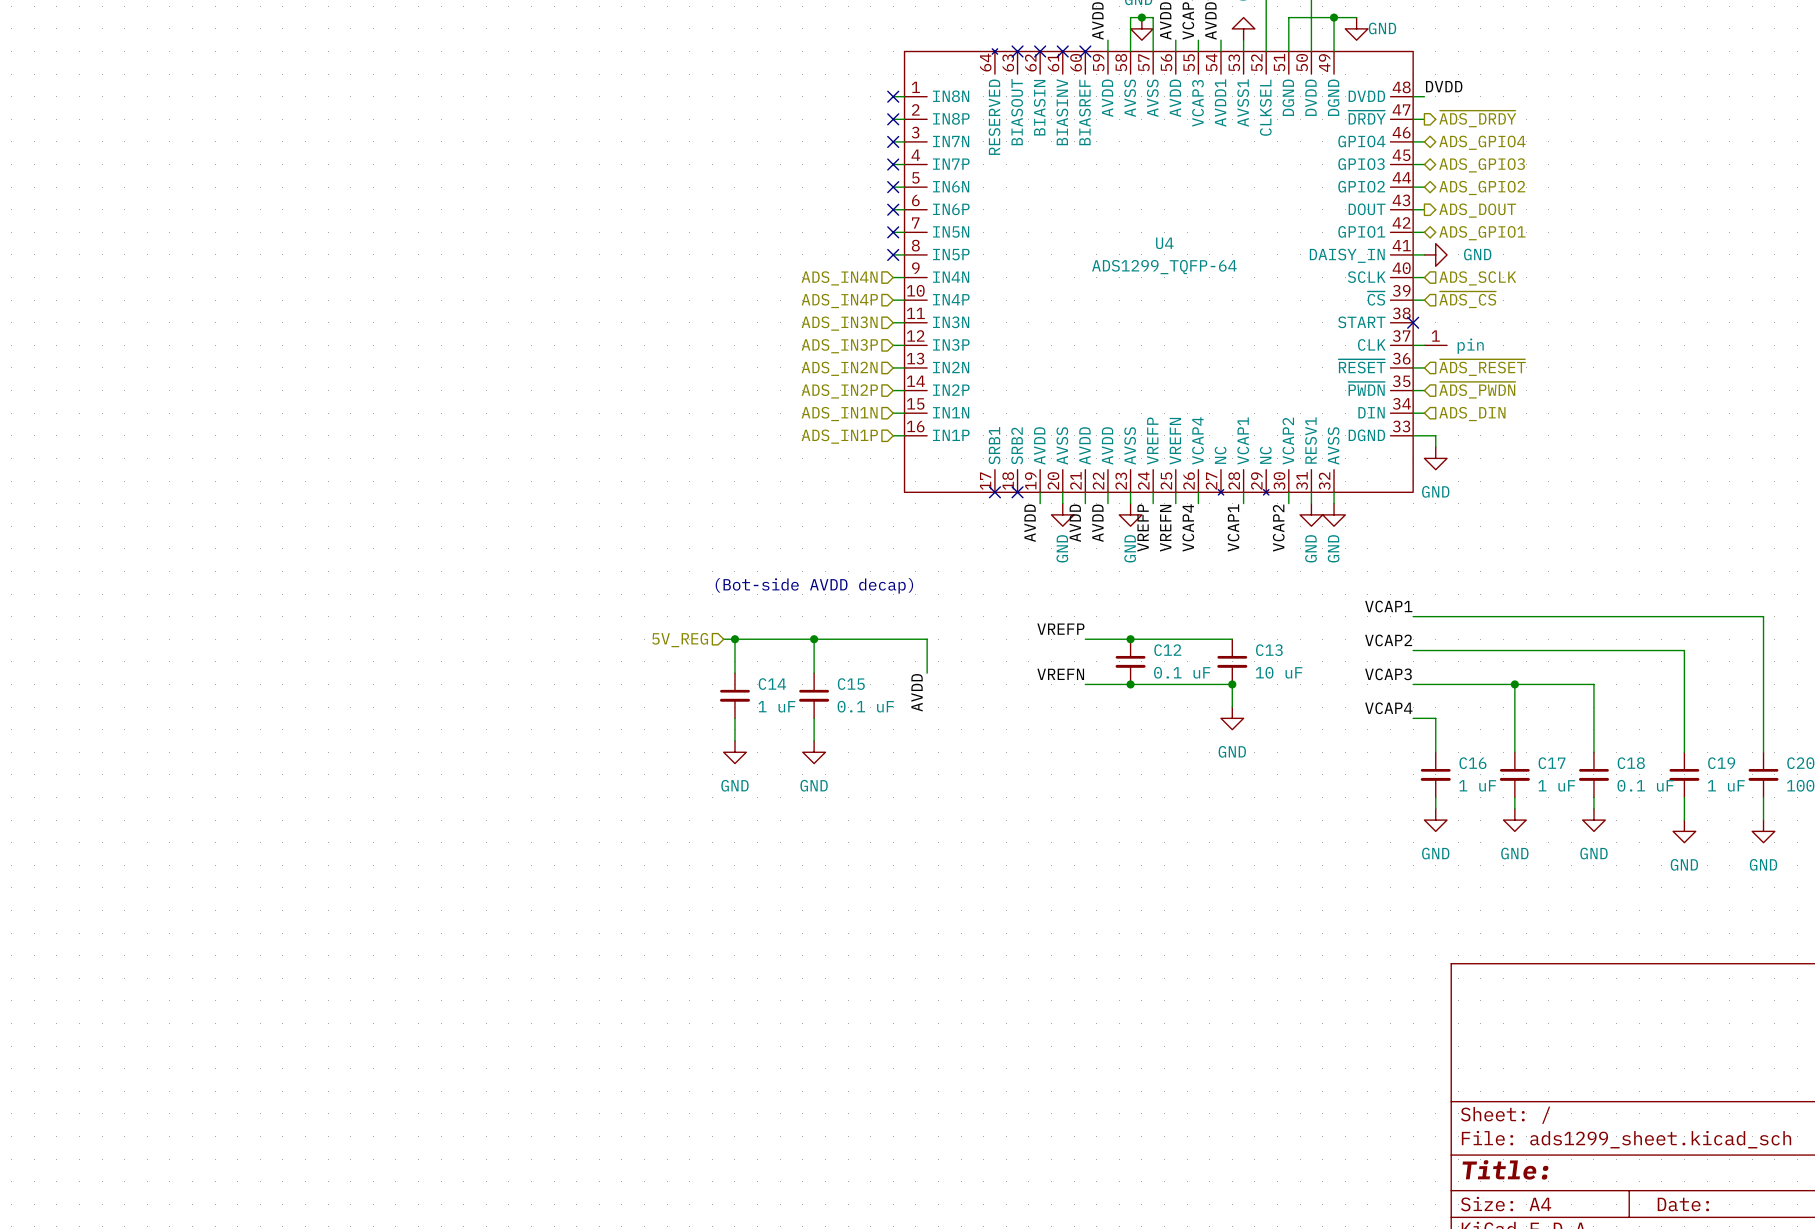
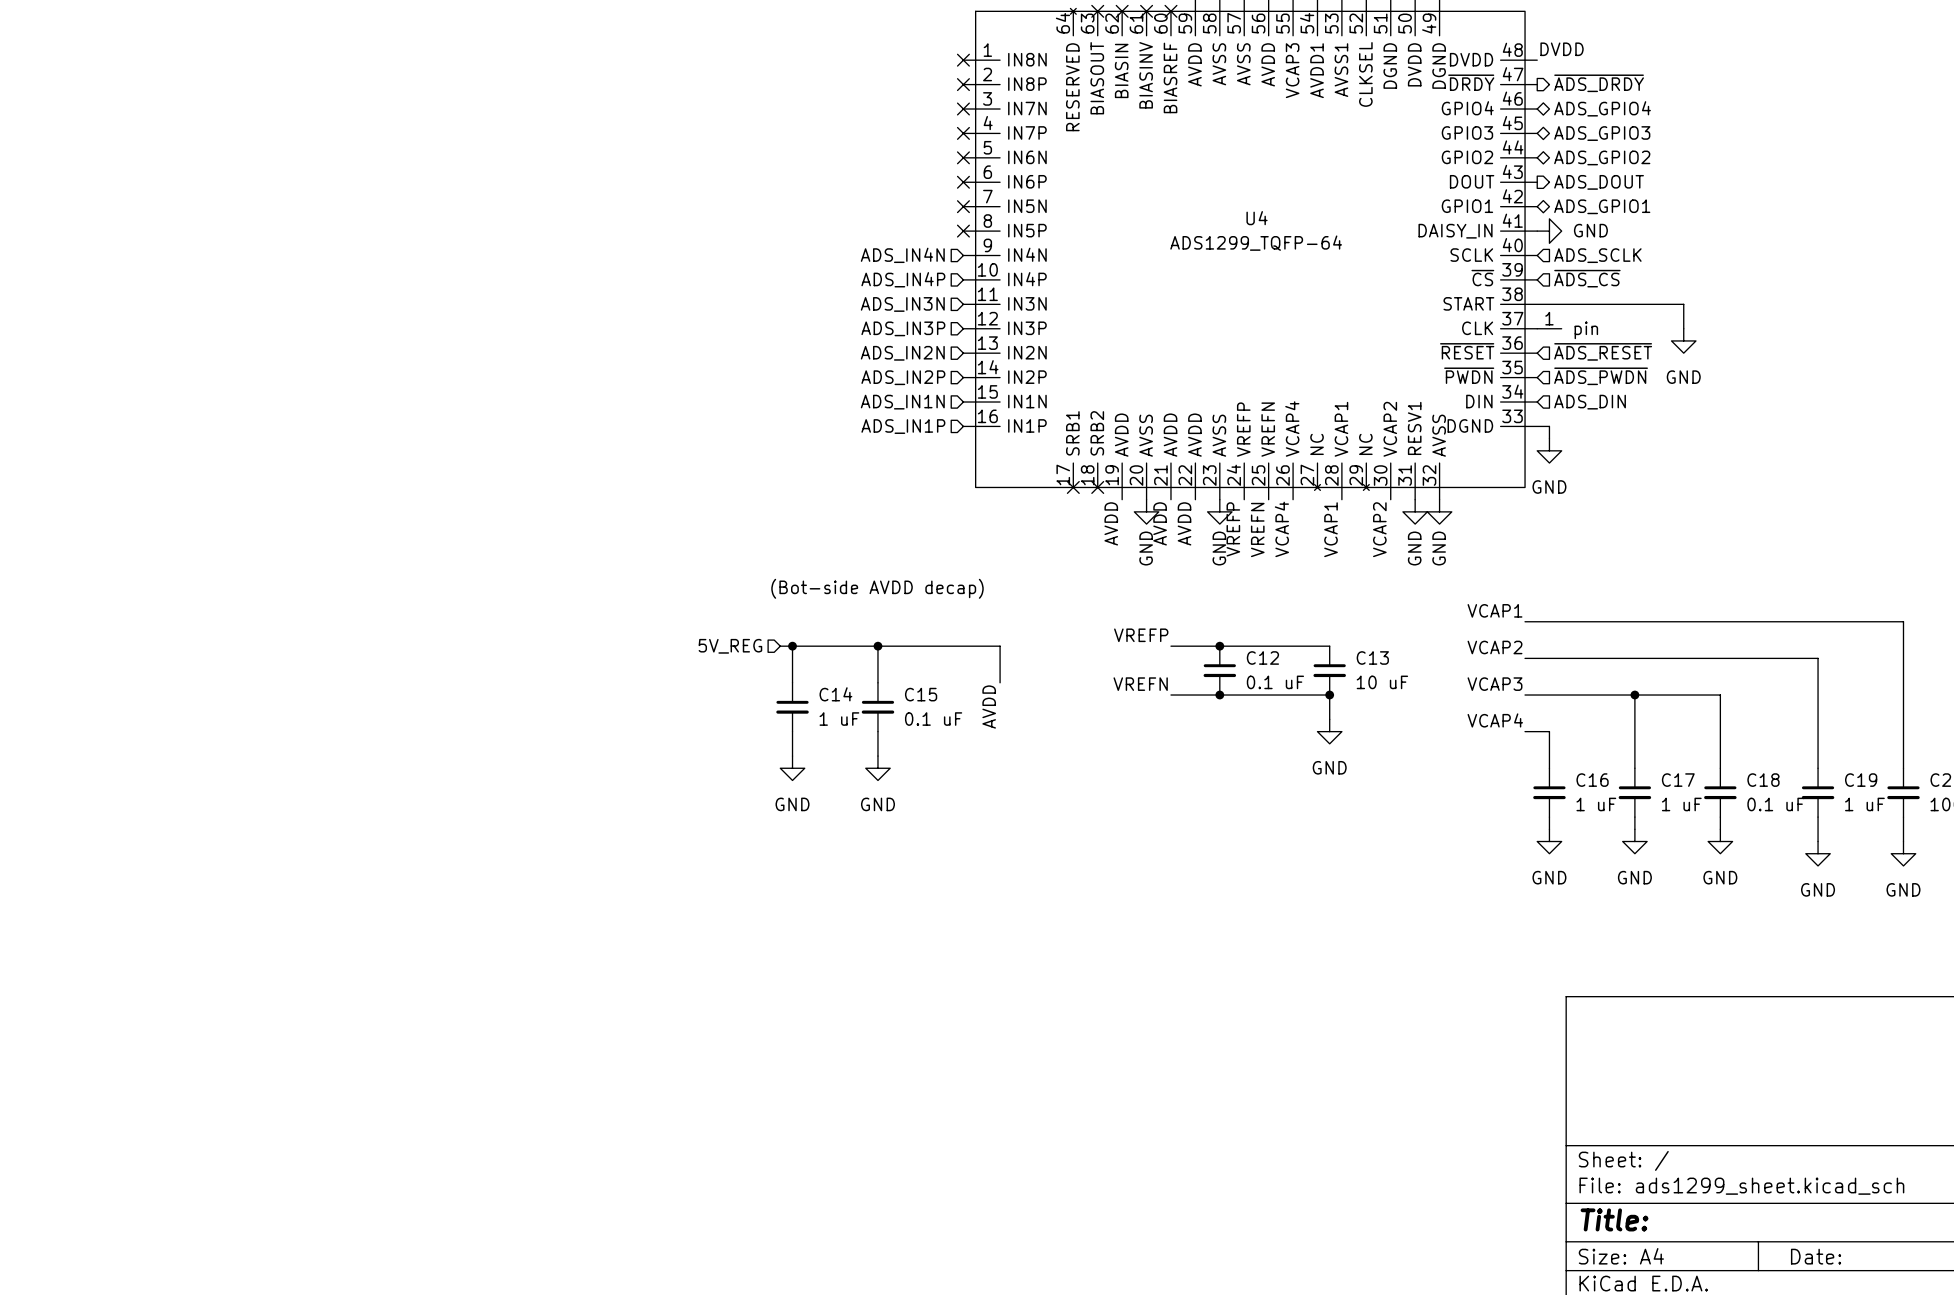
wire: none -> (1525, 304) (1683, 304) (1683, 328)
no-connect mark: (1413, 322) -> none
power symbol: none -> GND (1683, 340)

